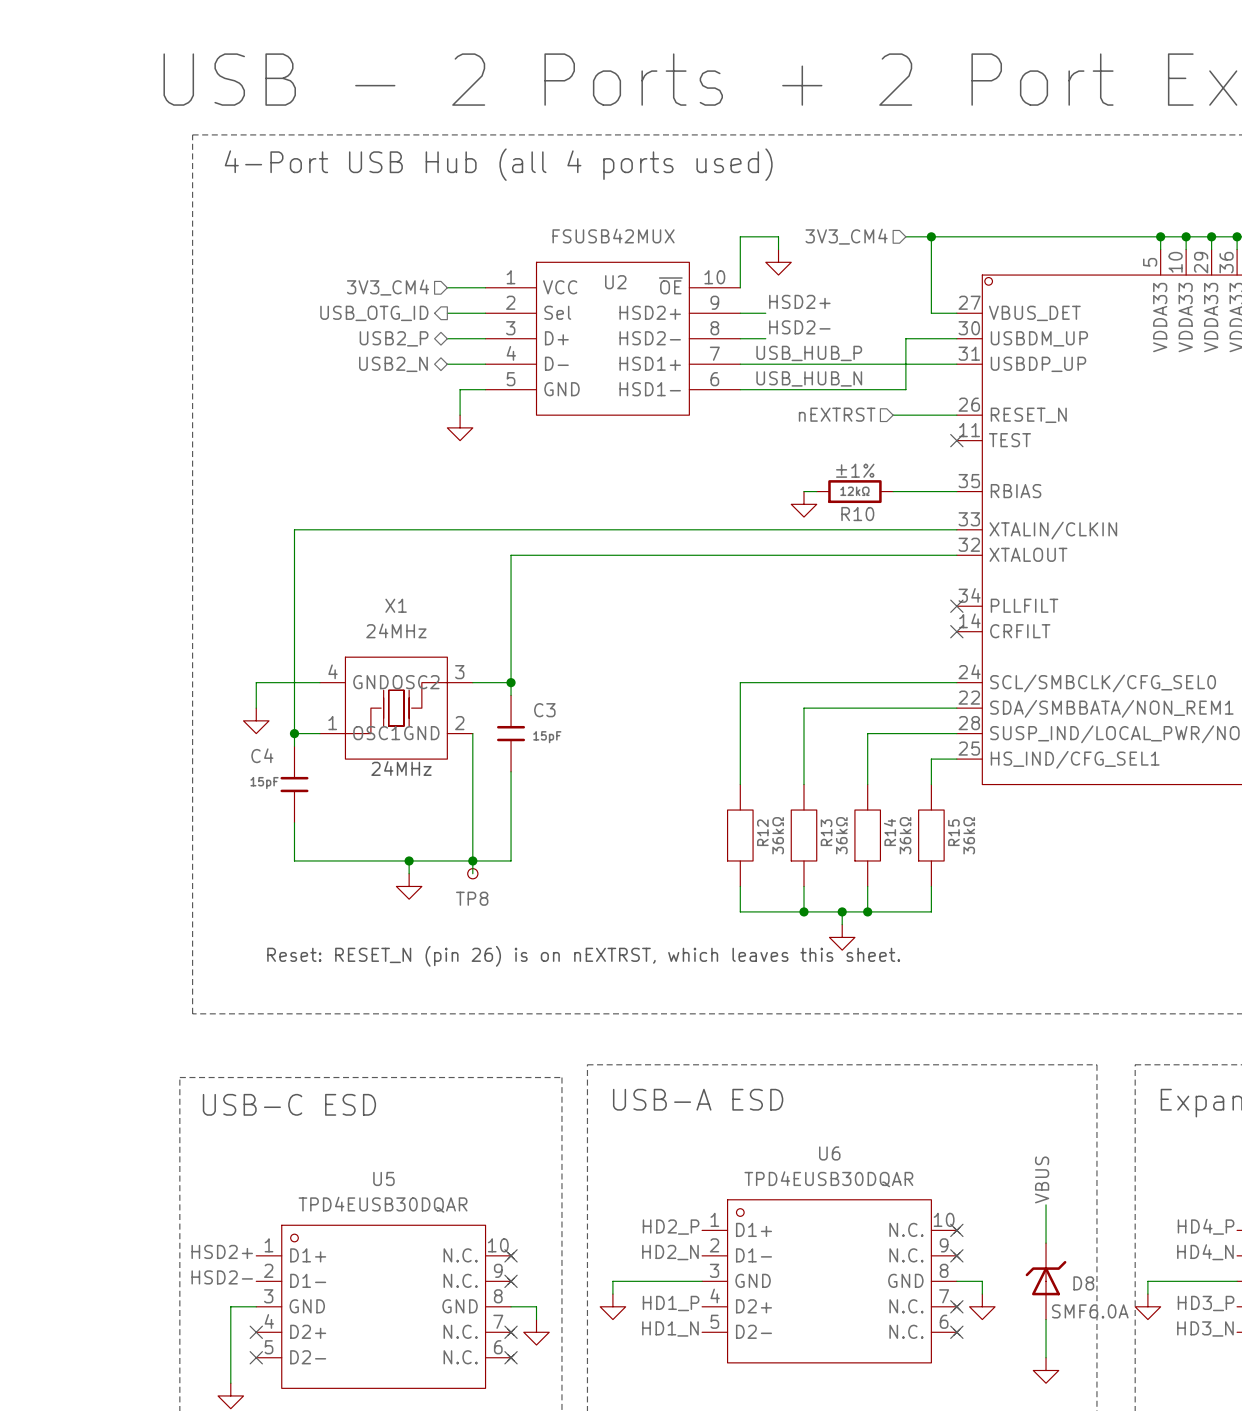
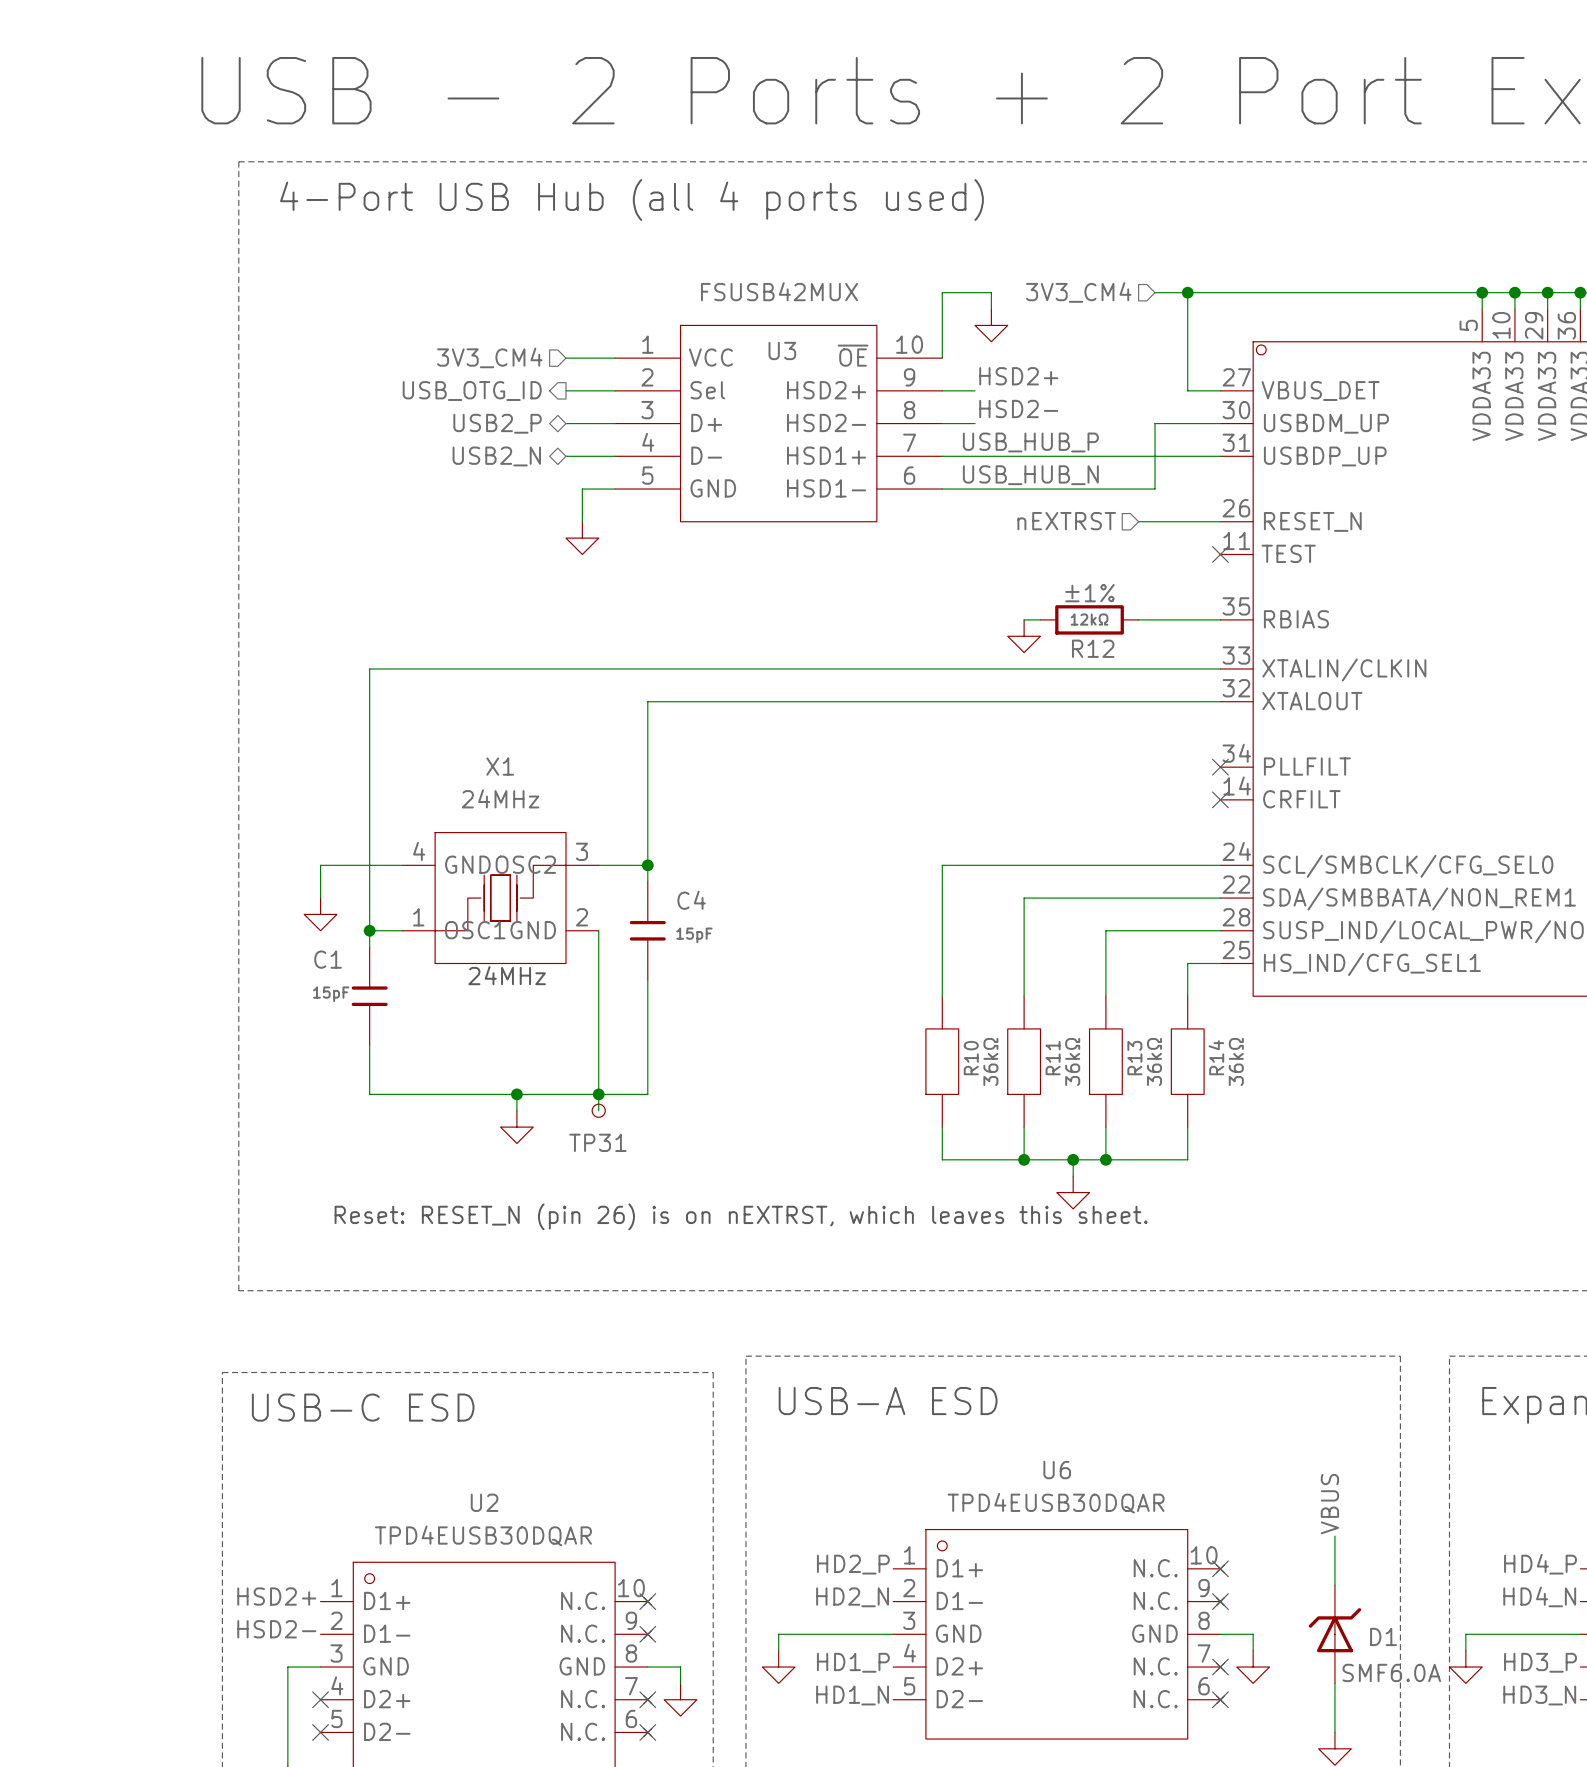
U2 name: U2 (615, 282) -> U3 (782, 350)
R10 name: R10 (857, 514) -> R12 (1093, 648)
C3 name: C3 (544, 710) -> C4 (691, 900)
C4 name: C4 (262, 755) -> C1 (328, 959)
R12 name: R12 (762, 832) -> R10 (971, 1058)
R13 name: R13 (826, 832) -> R11 (1053, 1058)
R14 name: R14 (889, 832) -> R13 (1134, 1058)
R15 name: R15 (953, 832) -> R14 (1216, 1057)
TP8 name: TP8 (472, 898) -> TP31 (597, 1142)
U5 name: U5 (383, 1178) -> U2 (484, 1502)
D8 name: D8 (1083, 1283) -> D1 (1383, 1636)

